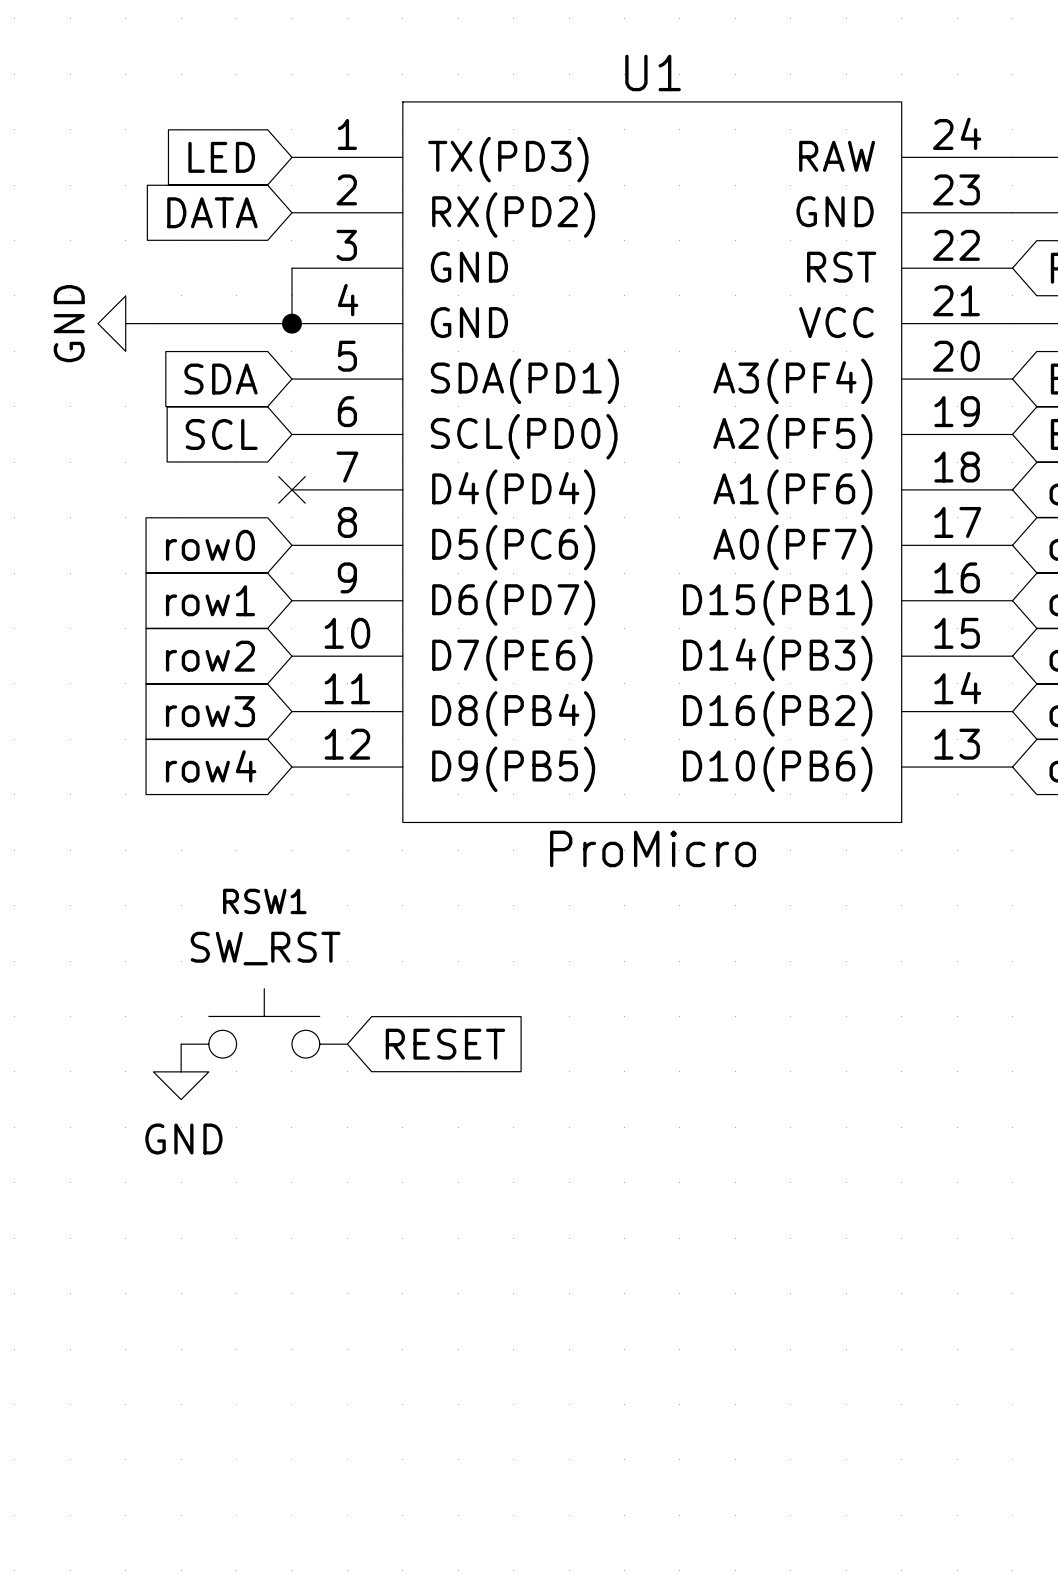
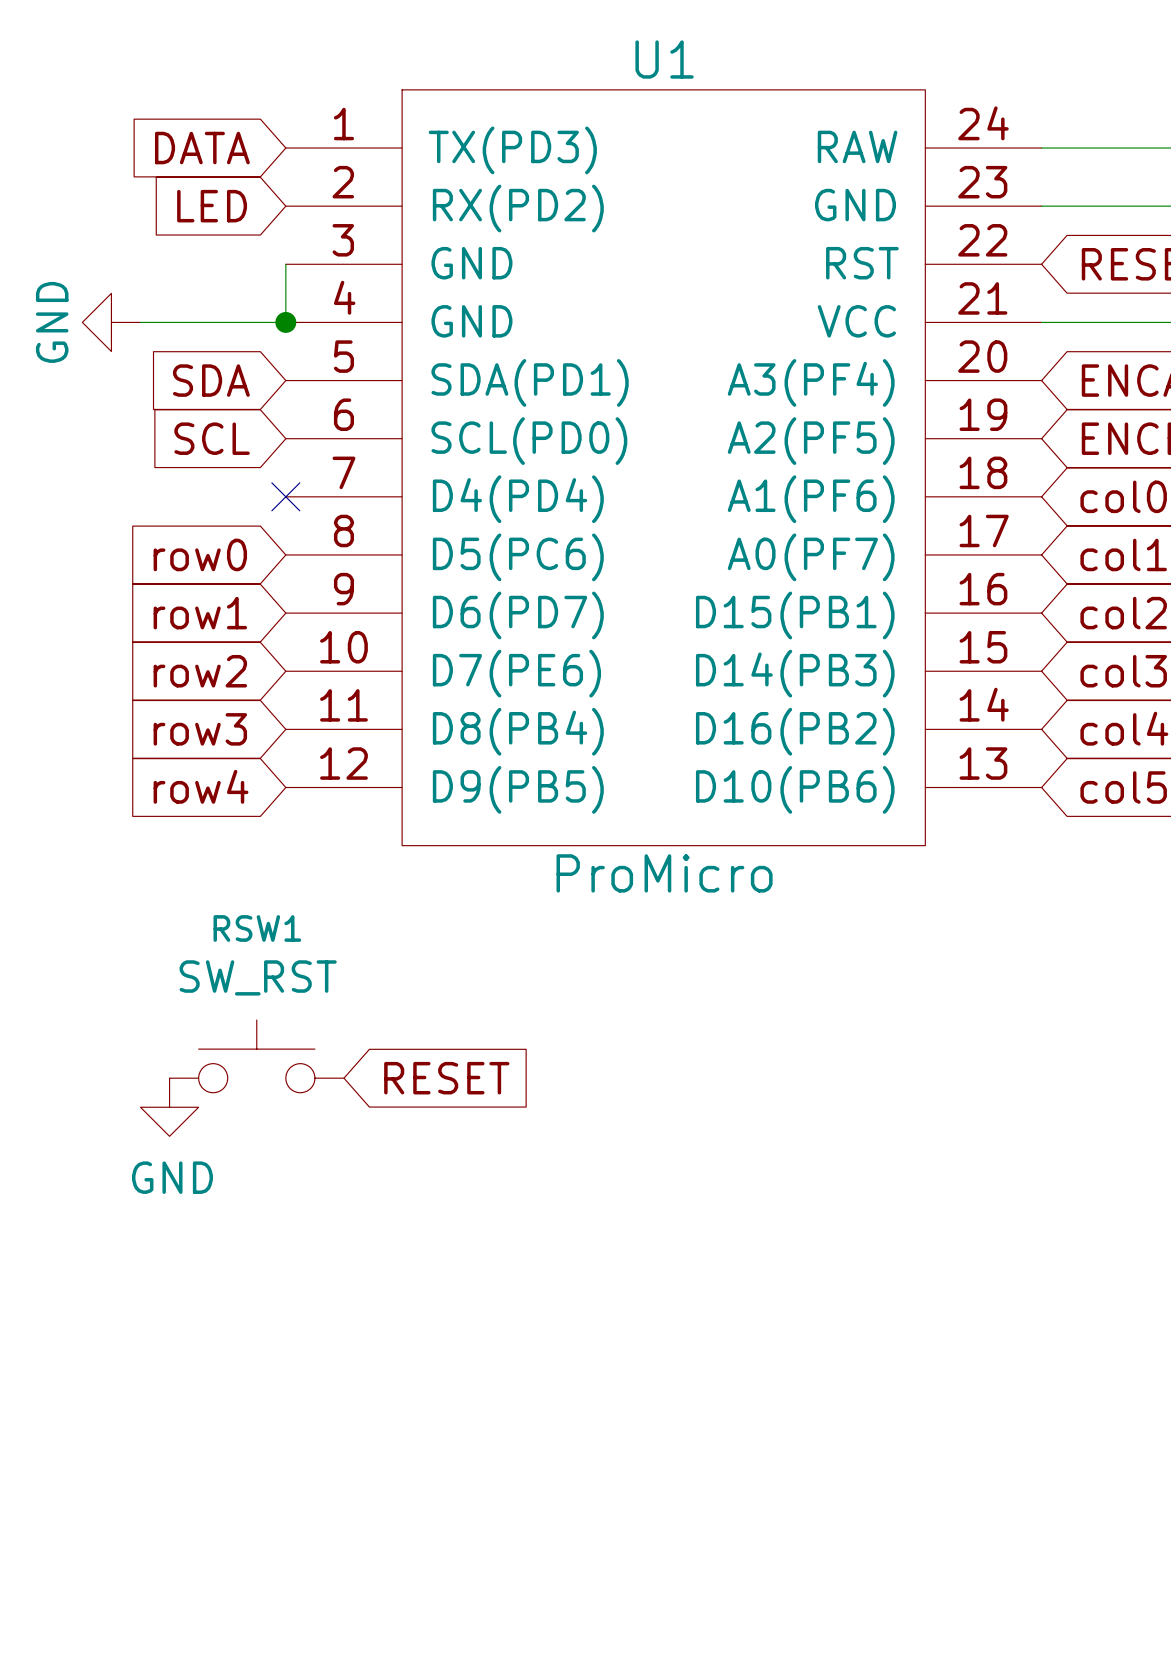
global label: LED (221, 157) -> DATA (202, 148)
global label: DATA (212, 212) -> LED (212, 206)

